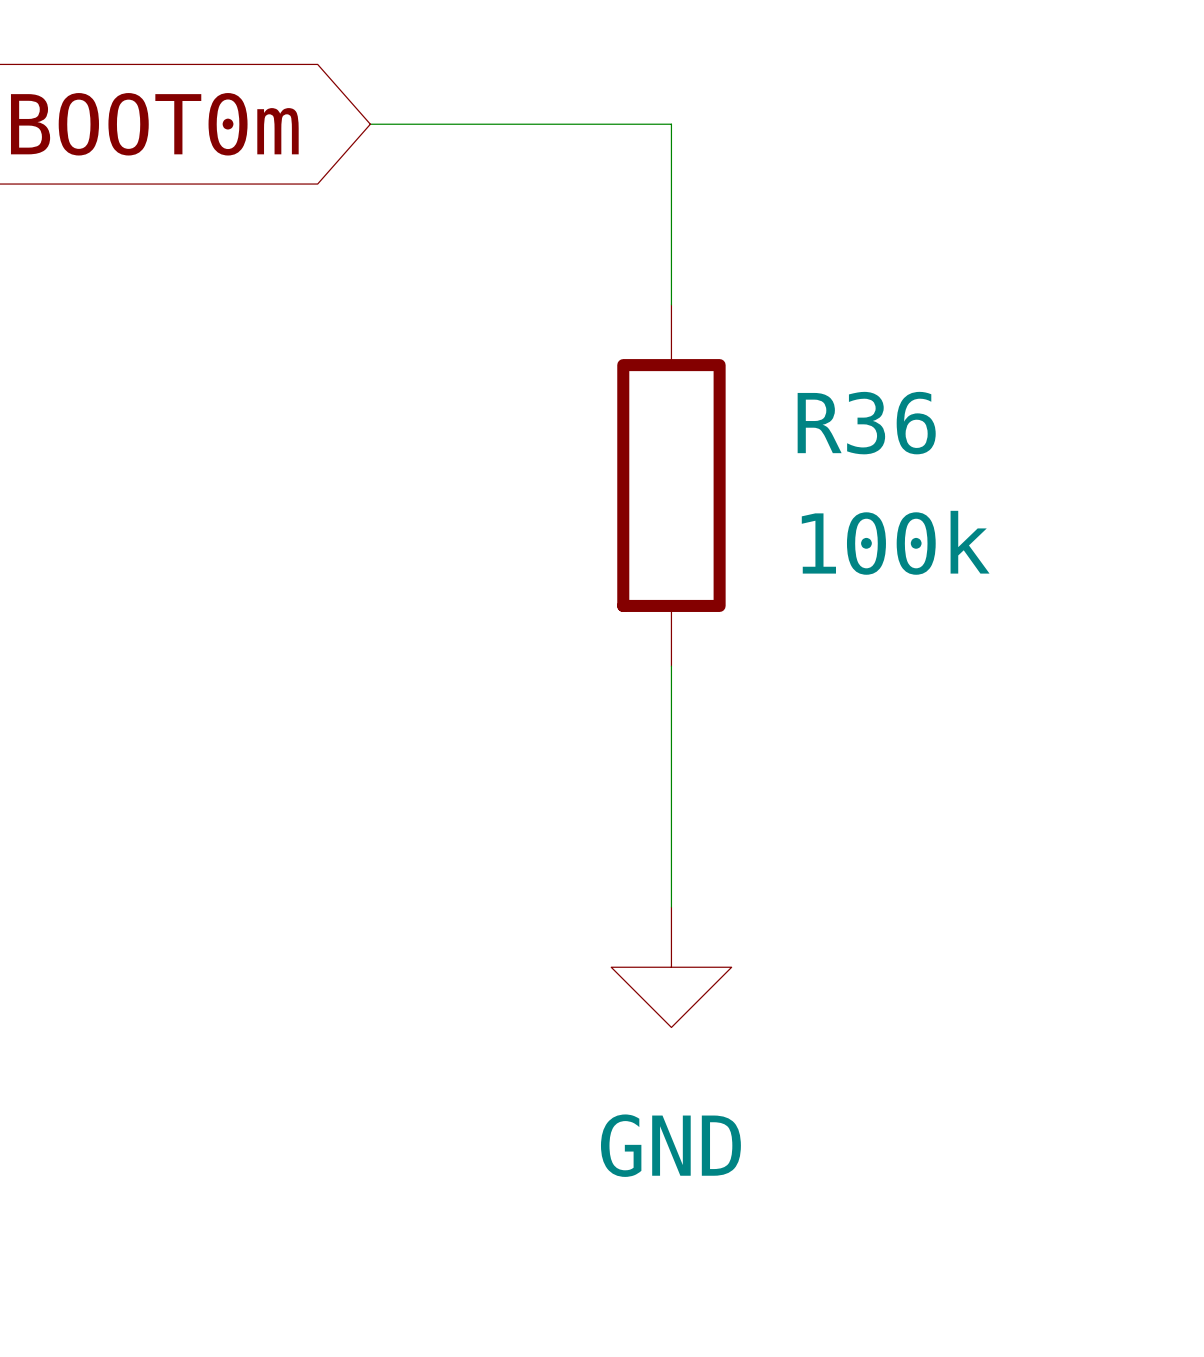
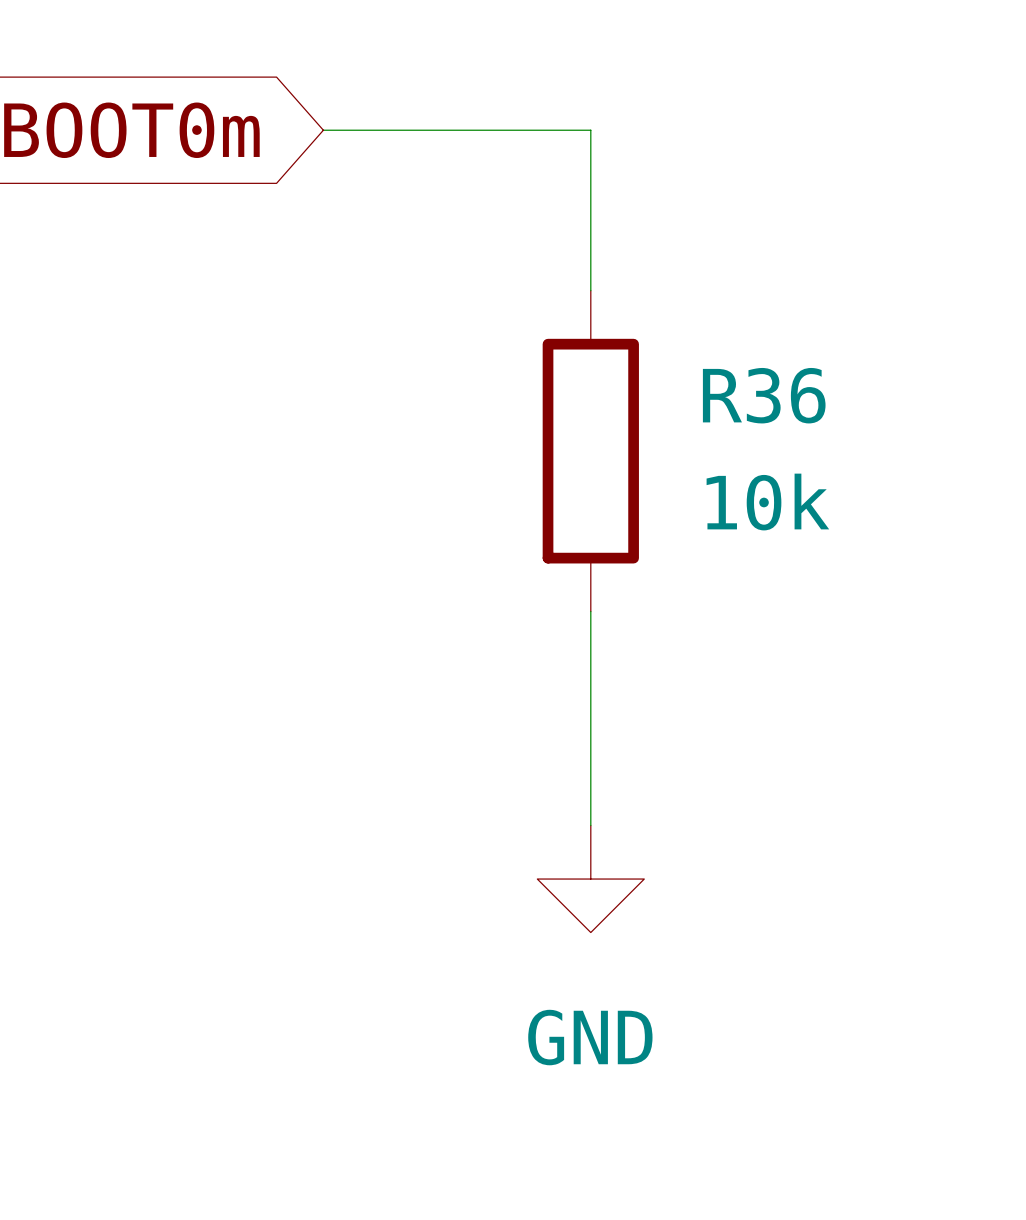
R36 value: 100k (895, 542) -> 10k (767, 502)

